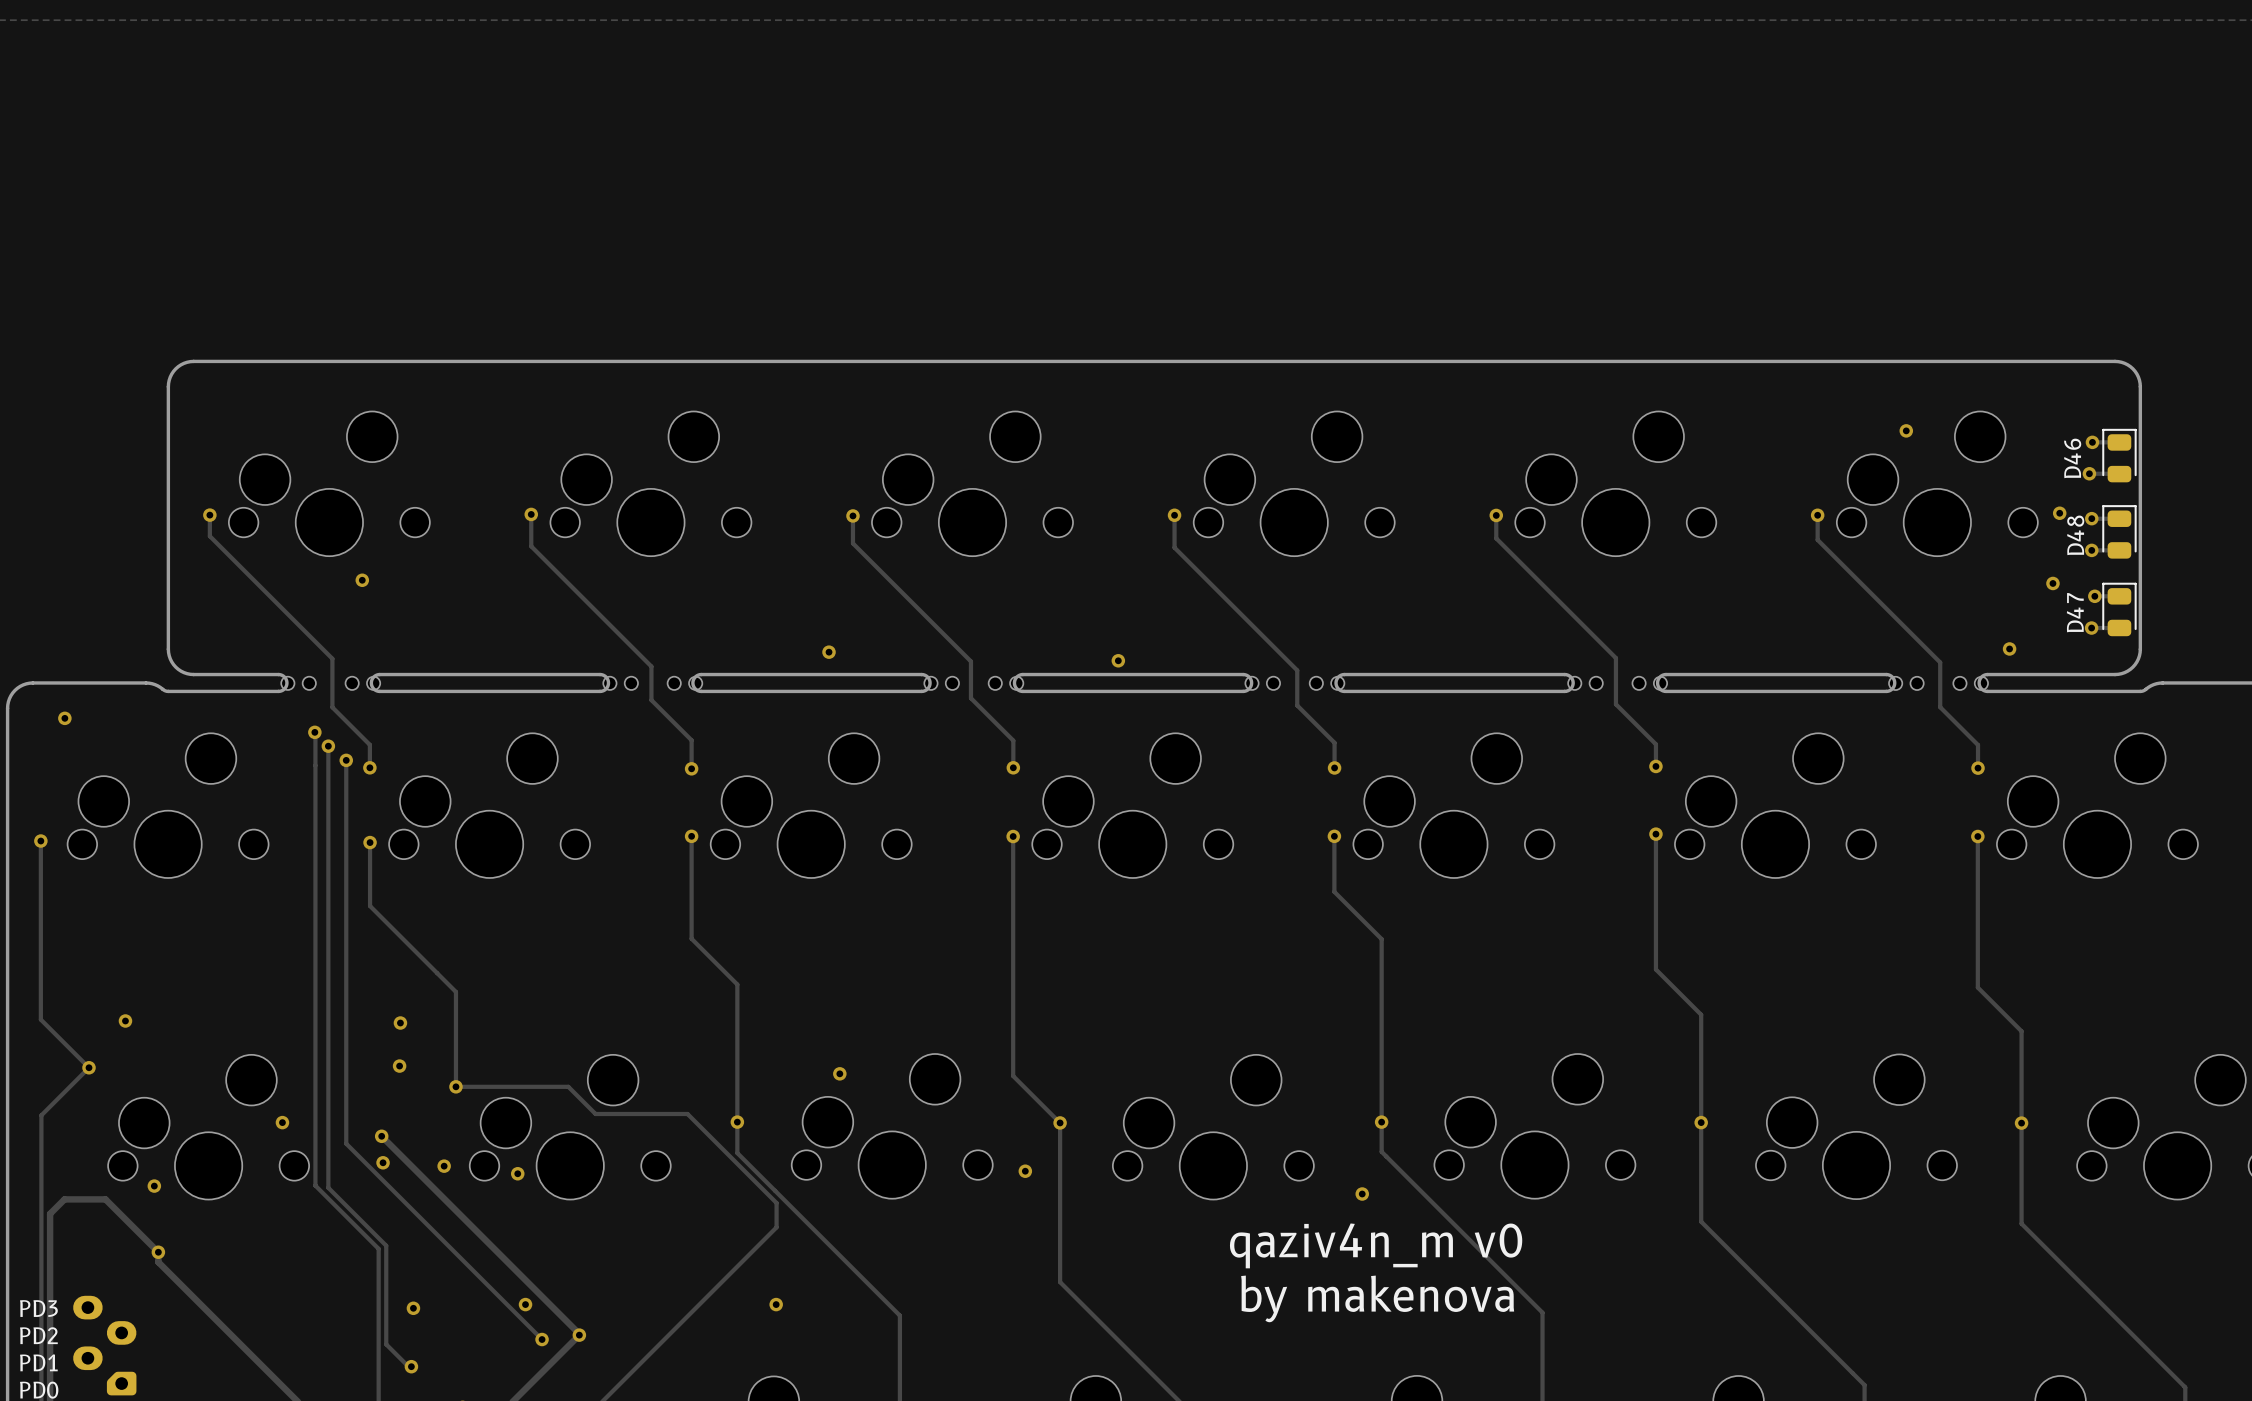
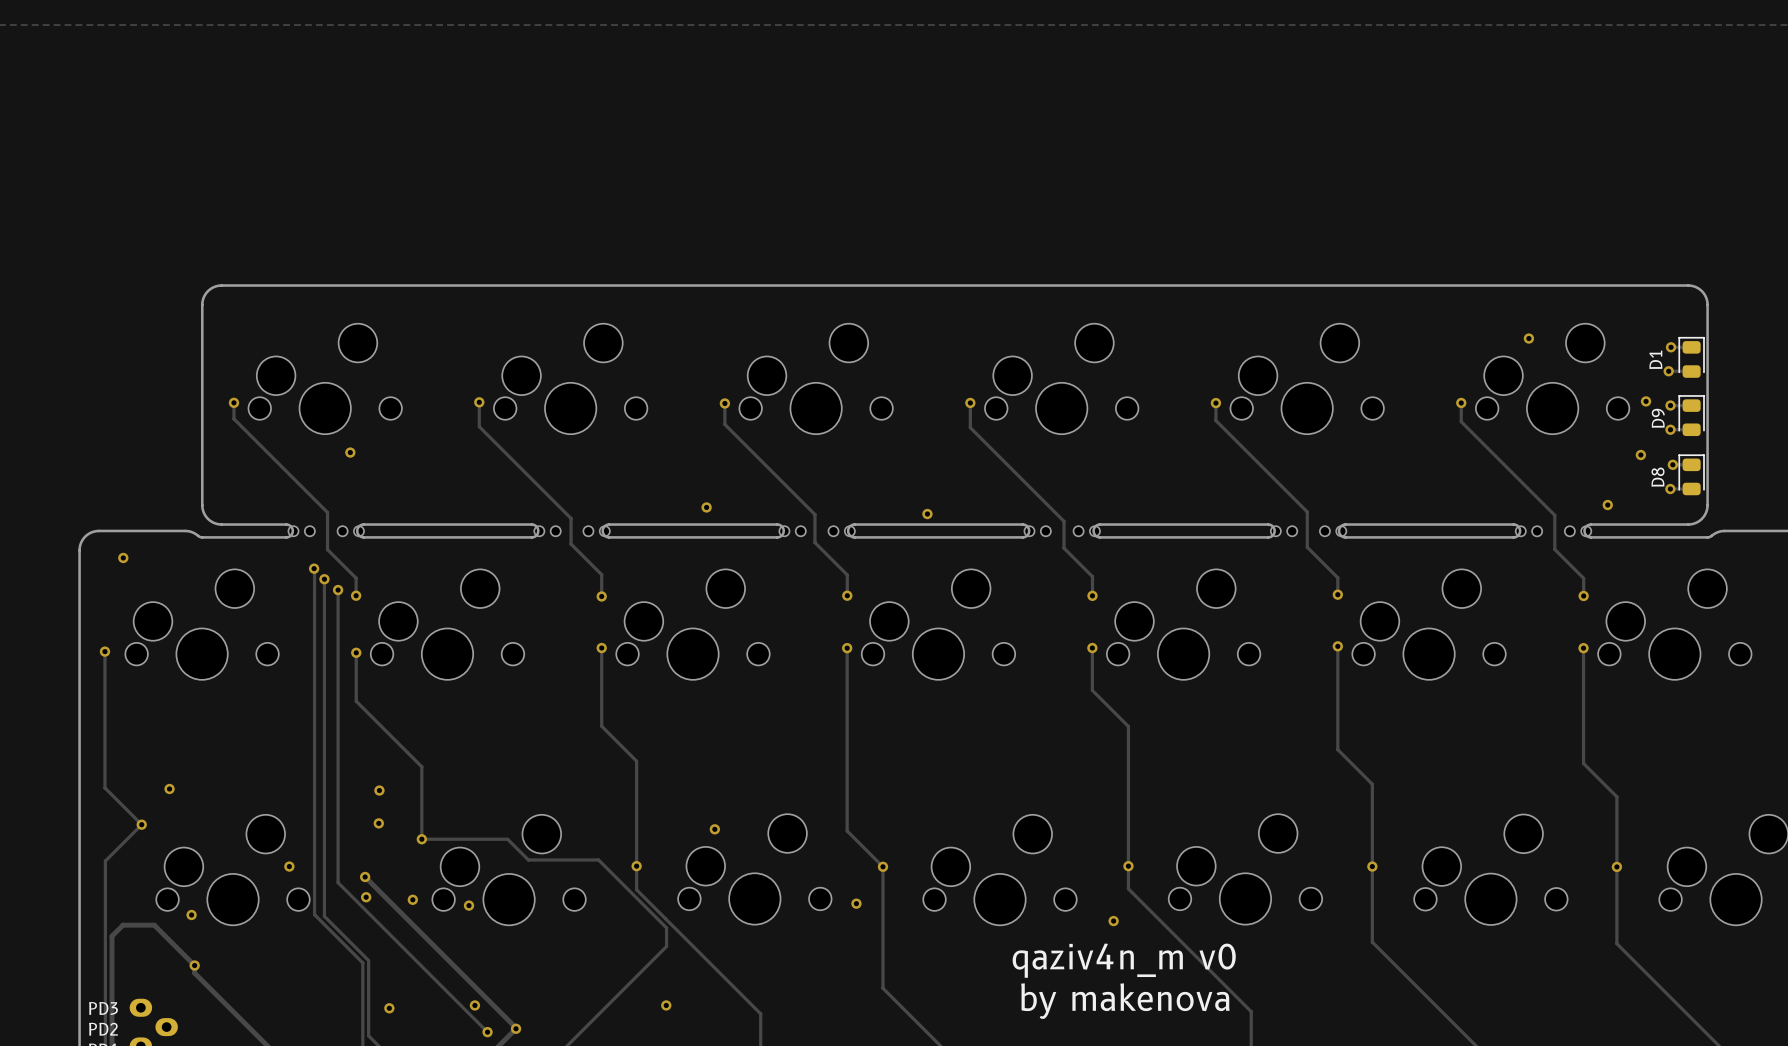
D46 name: D46 (2072, 458) -> D1 (1655, 359)
D48 name: D48 (2075, 535) -> D9 (1658, 418)
D47 name: D47 (2075, 612) -> D8 (1658, 477)

